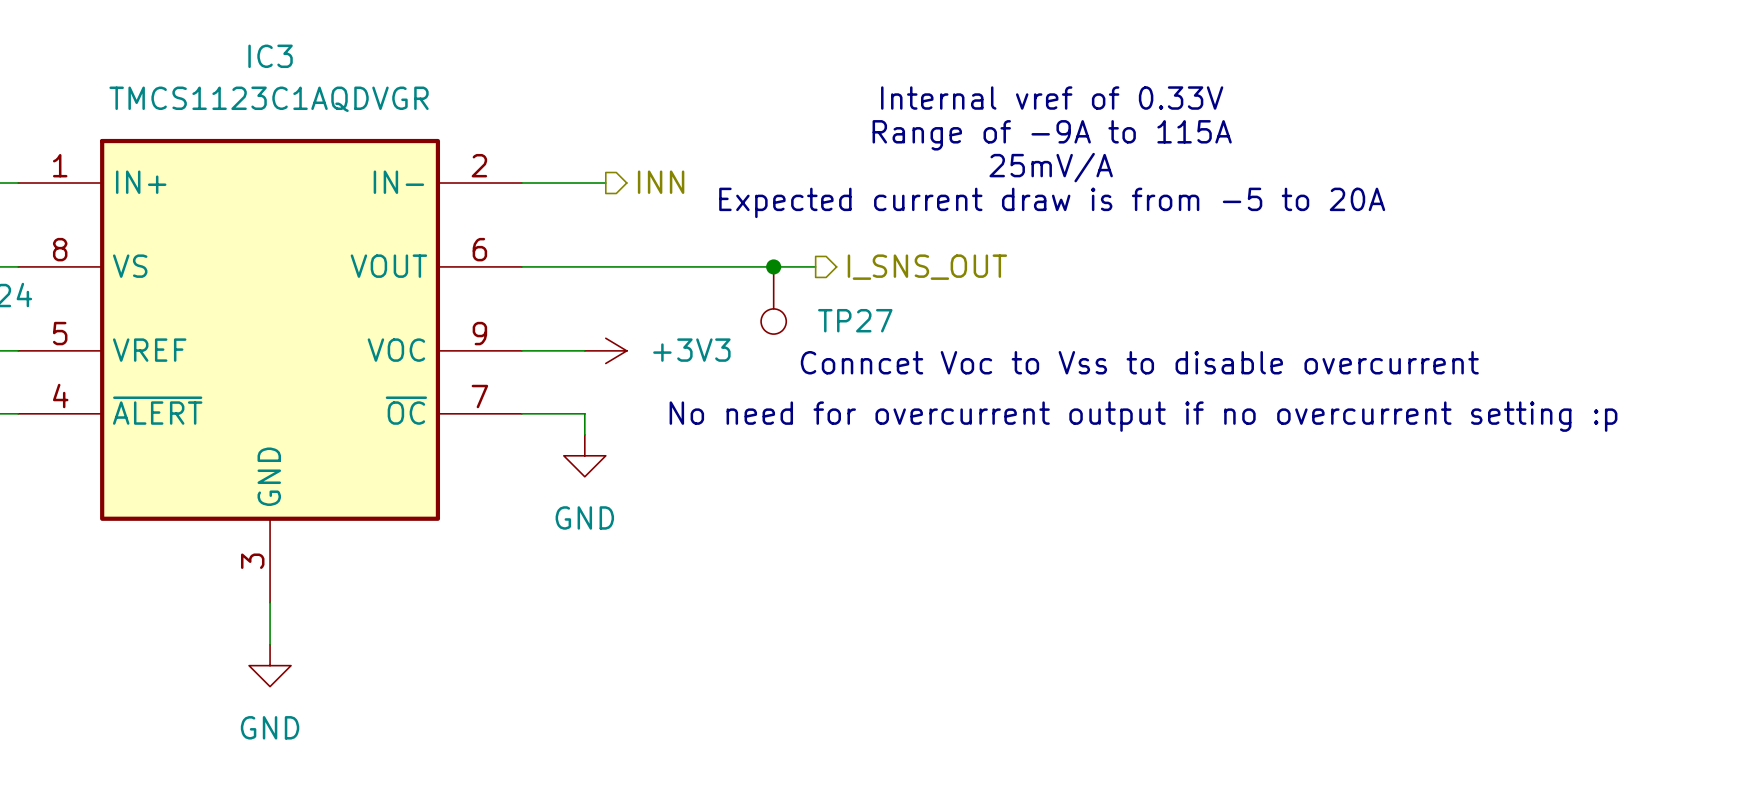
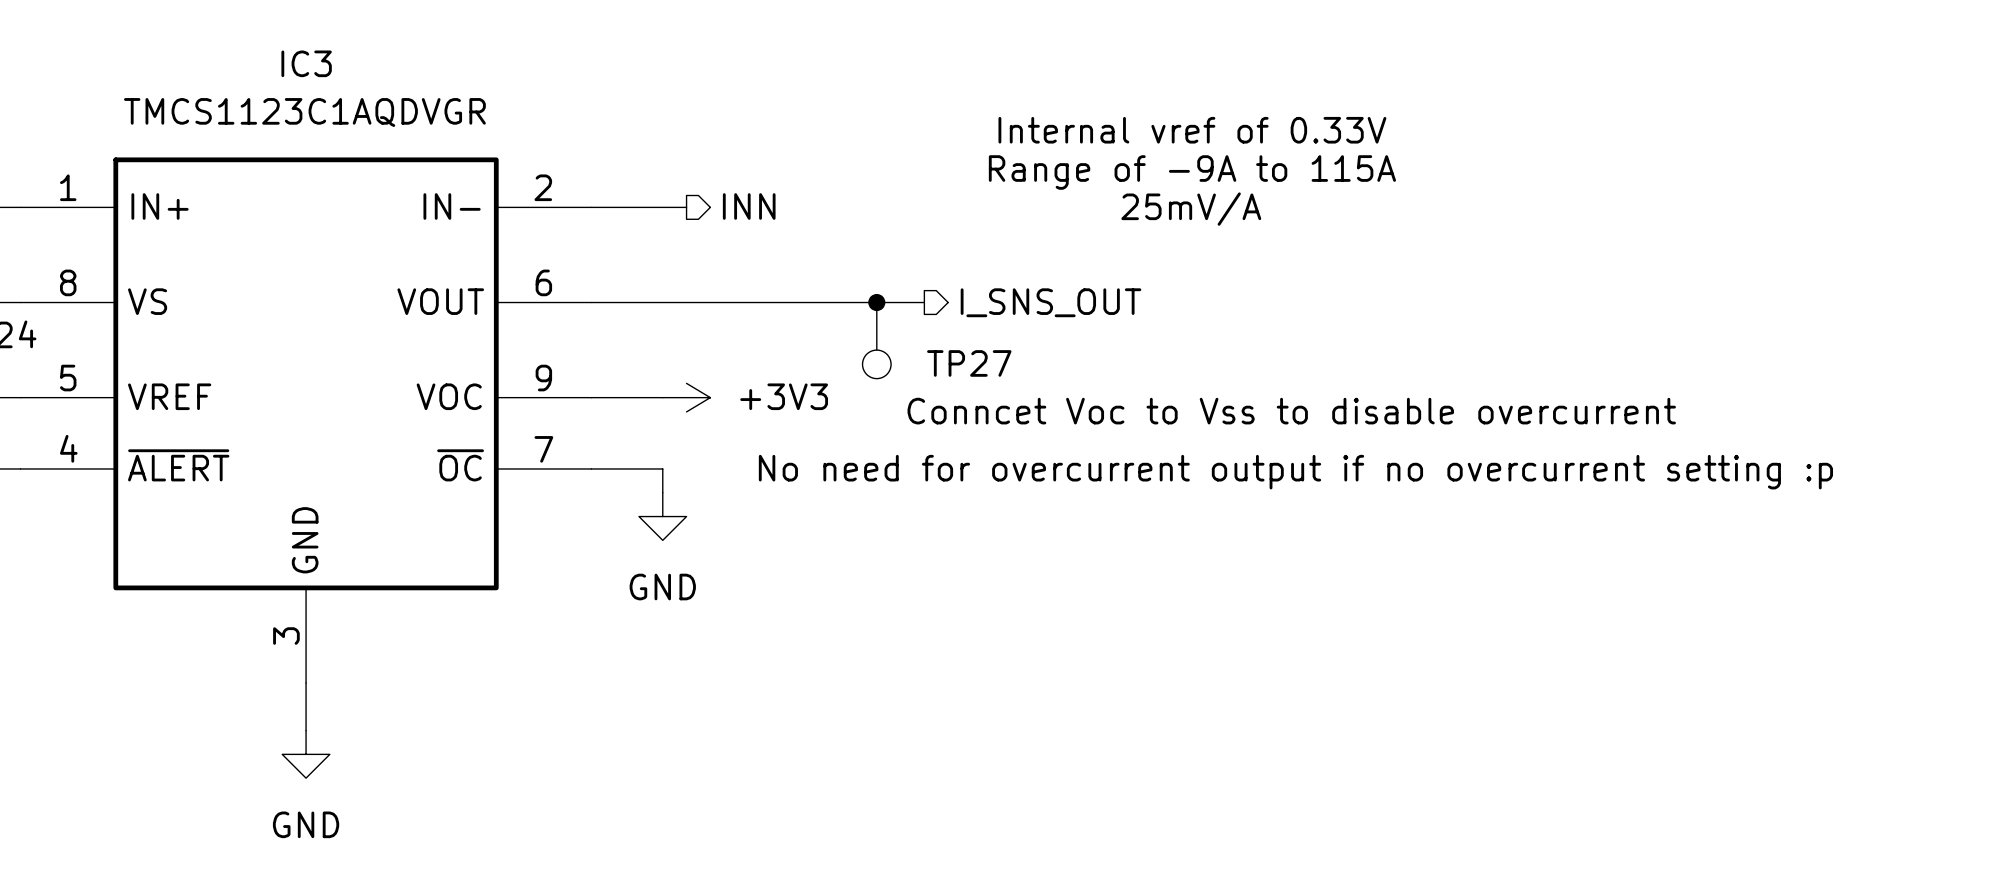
text position: Internal vref of 0.33V (1052, 98) -> Internal vref of 0.33V (1192, 130)
text position: Range of -9A to 115A (1052, 135) -> Range of -9A to 115A (1192, 172)
text position: 25mV/A (1051, 167) -> 25mV/A (1191, 209)
text: Expected current draw is from -5 to 20A (1052, 202) -> none

